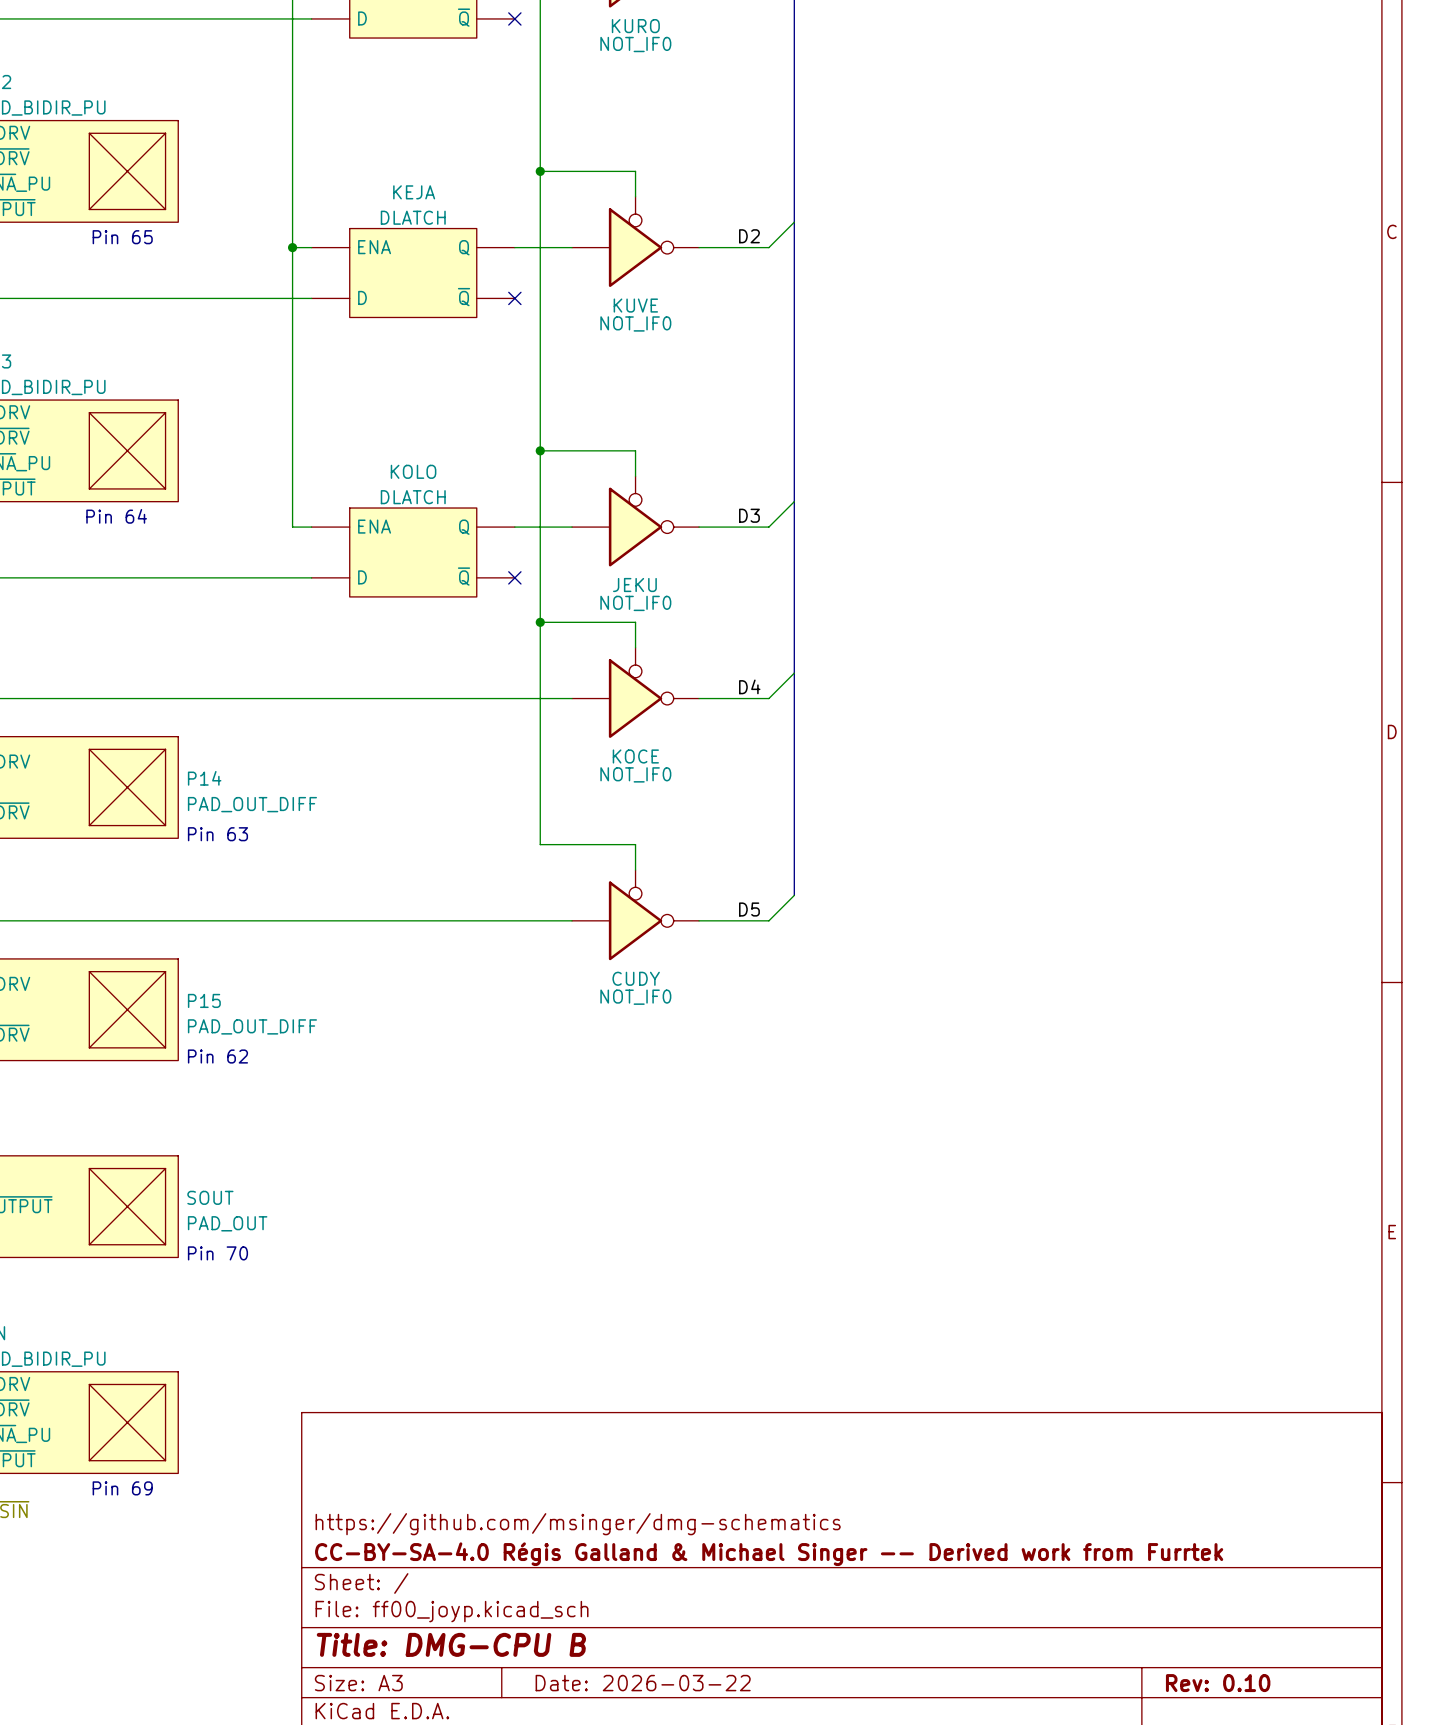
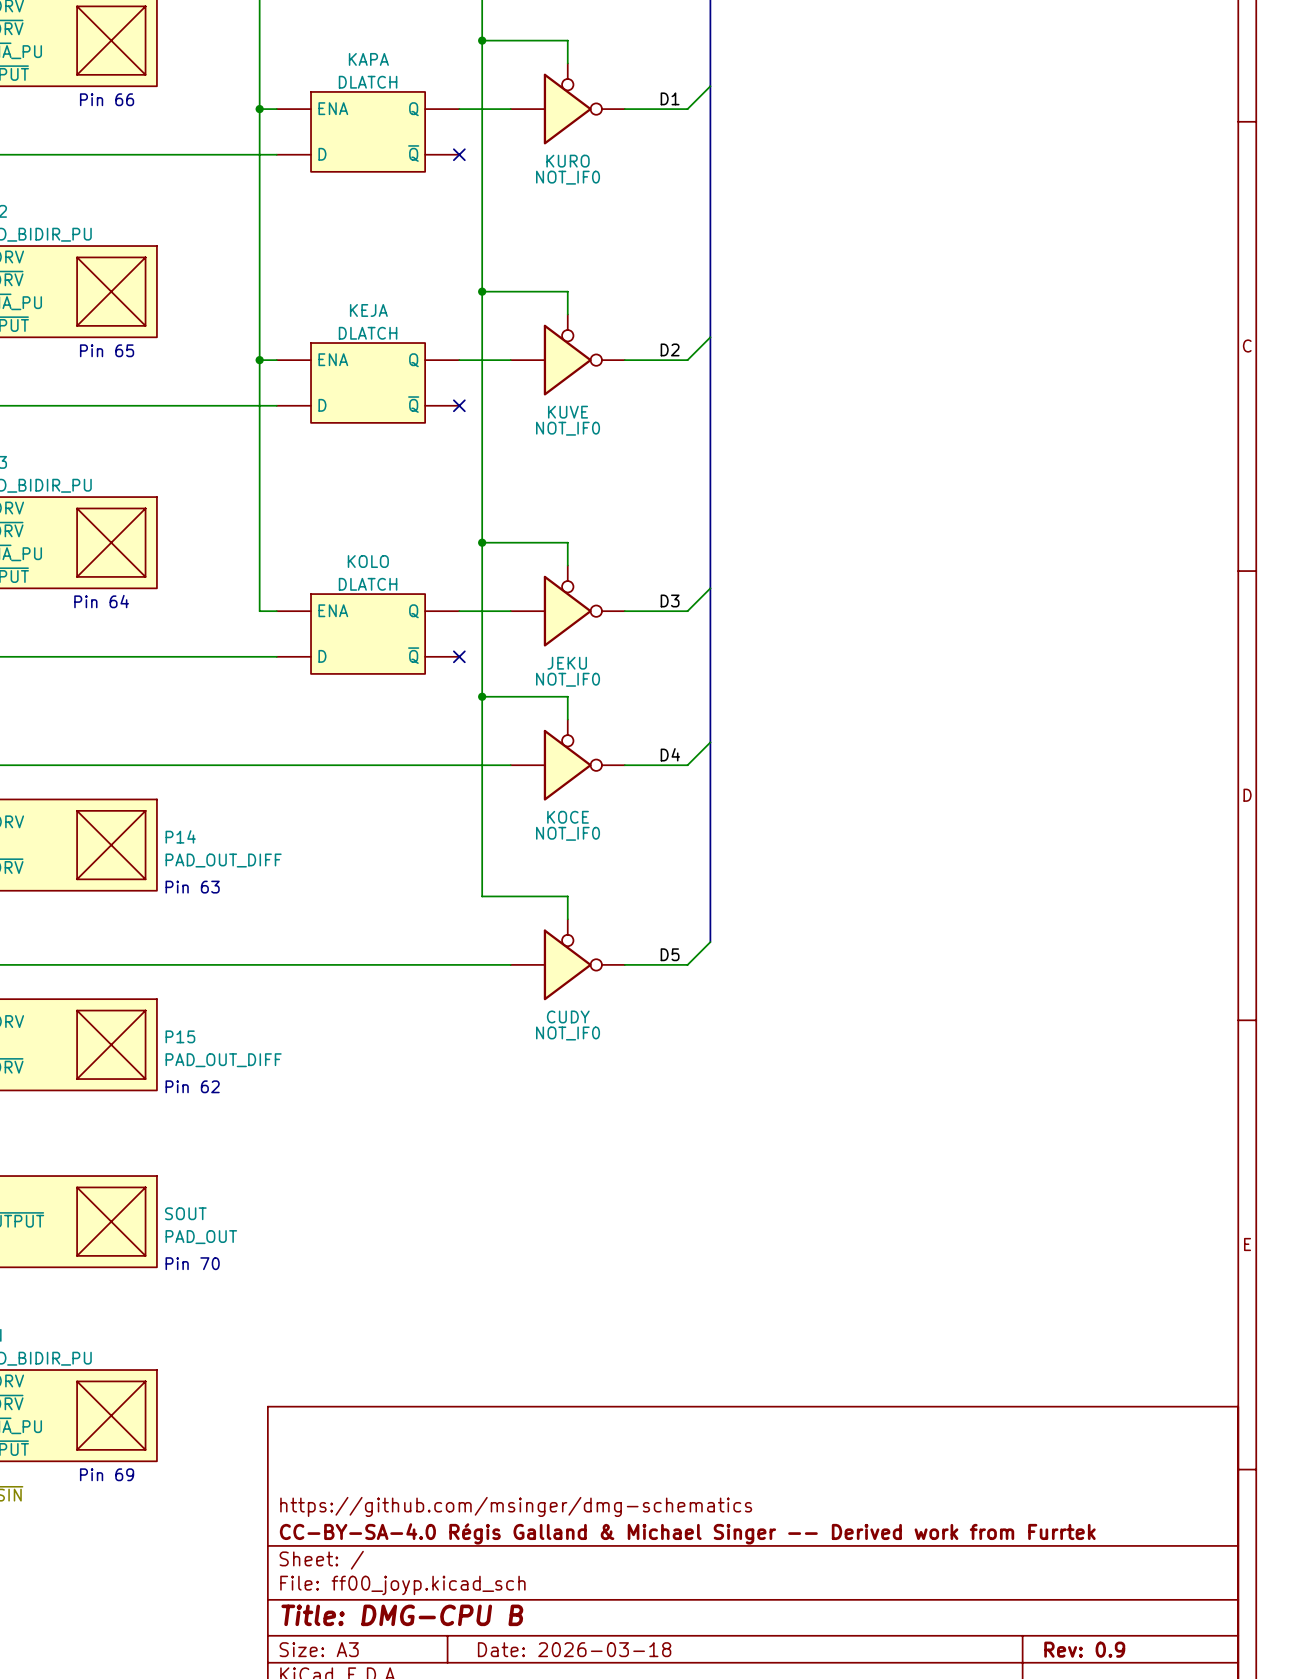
title block: Date: 2026-03-22 (643, 1683) -> Date: 2026-03-18 (574, 1649)
title block: Rev: 0.10 (1218, 1683) -> Rev: 0.9 (1084, 1649)

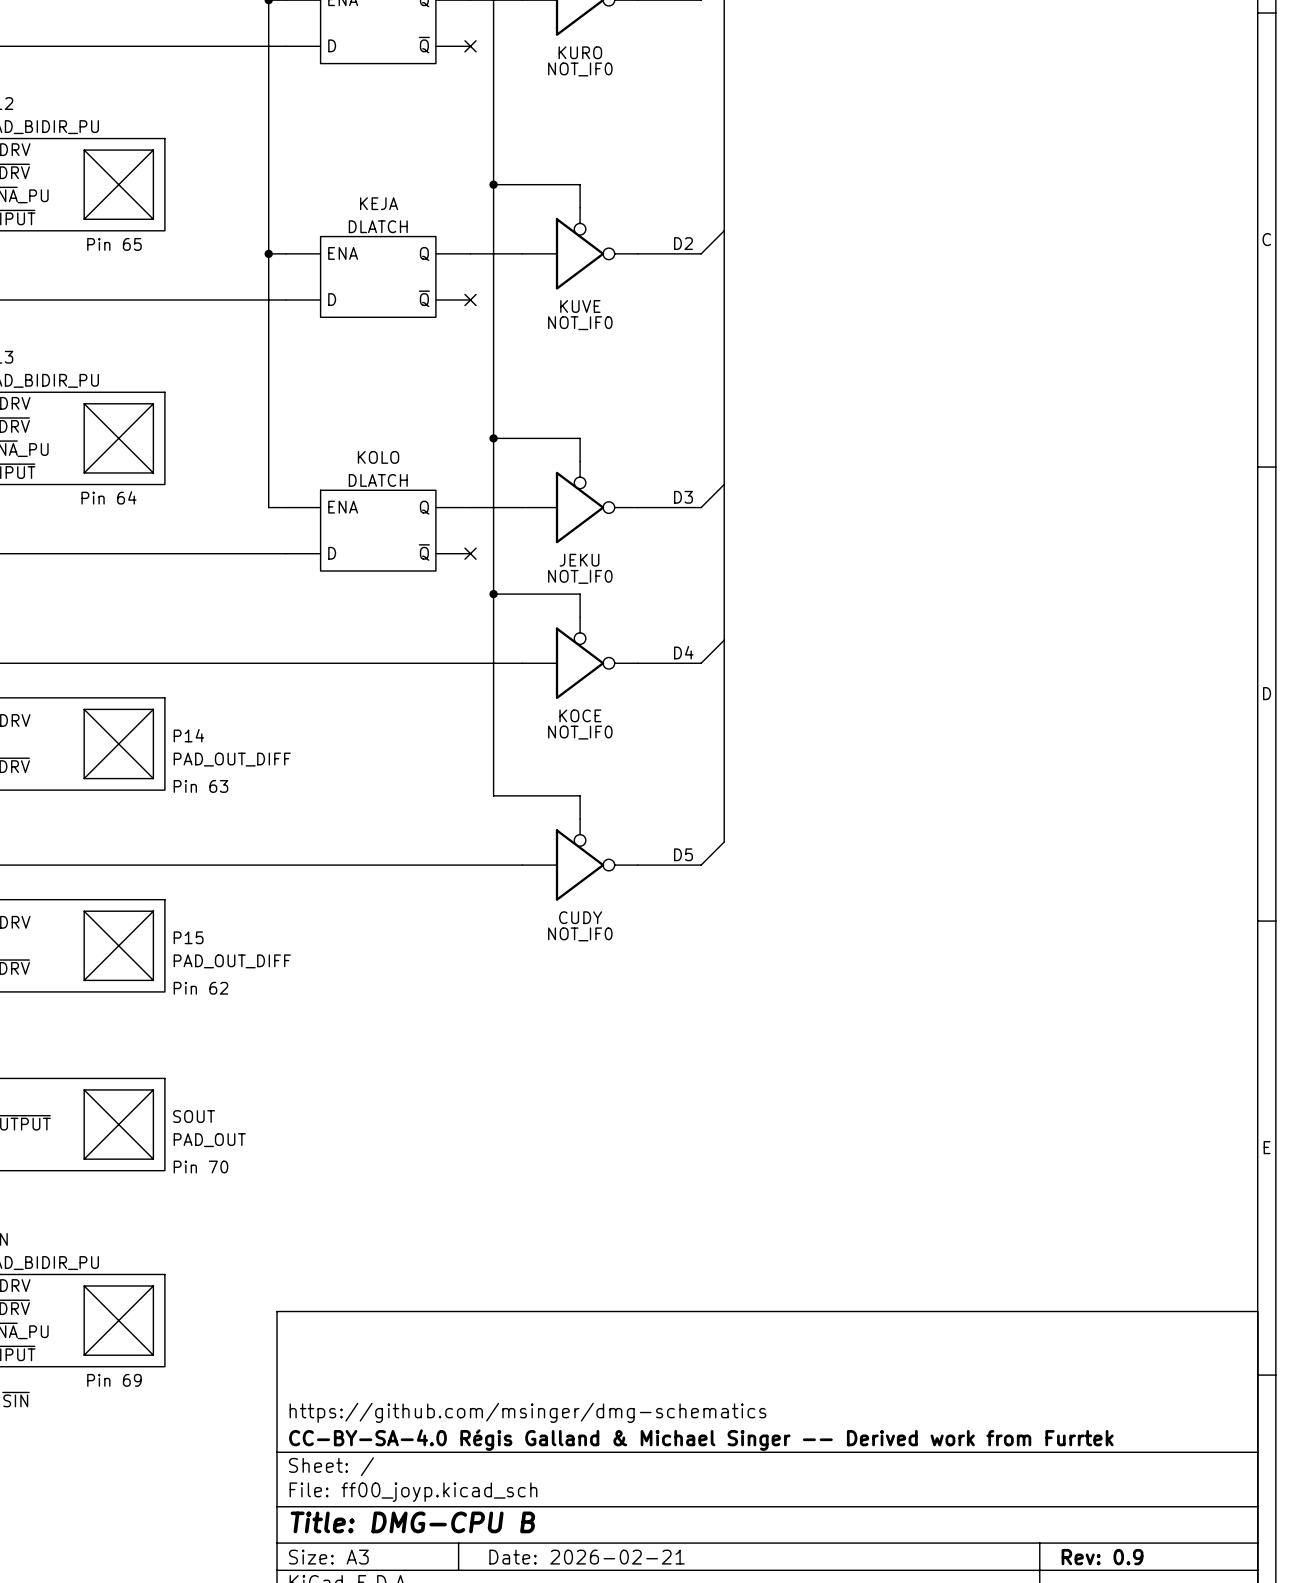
title block: Date: 2026-03-18 (574, 1649) -> Date: 2026-02-21 (586, 1557)

